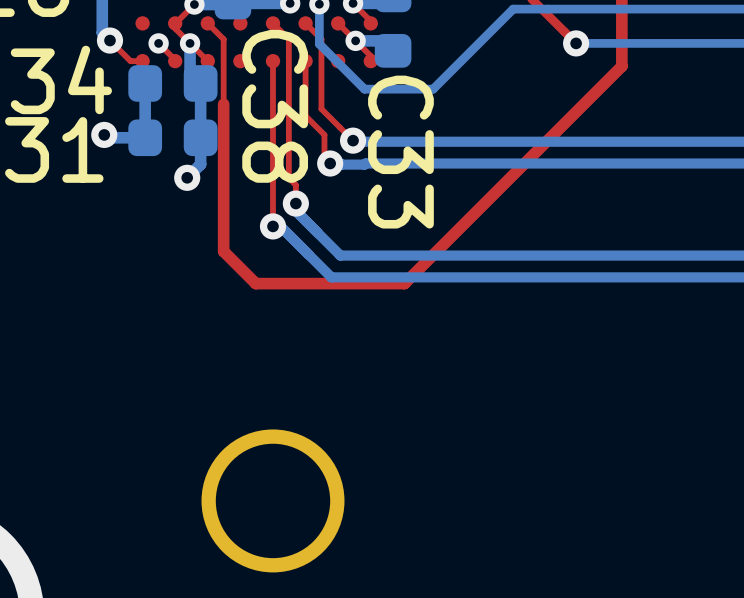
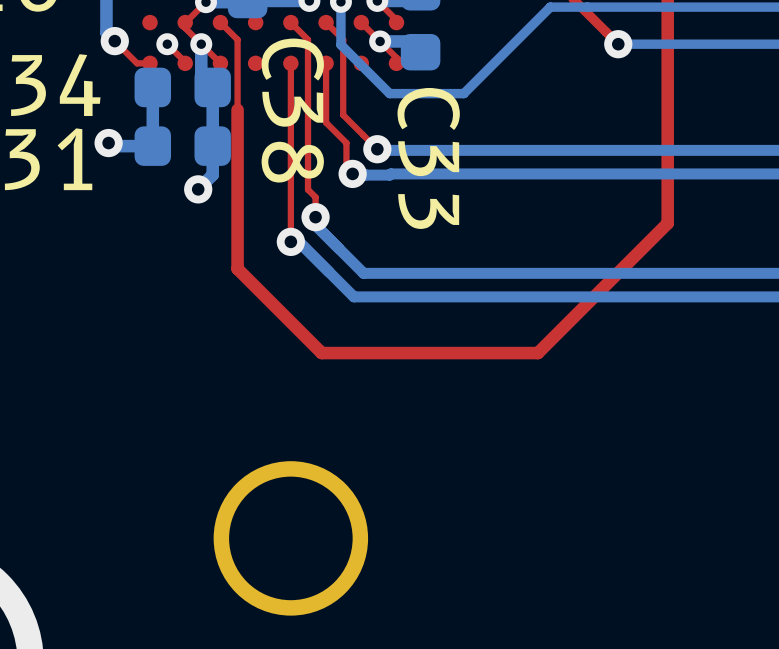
top track: (621, 66) (404, 283) (255, 283) -> (667, 68) (667, 223) (537, 353) (321, 353) (272, 303)

